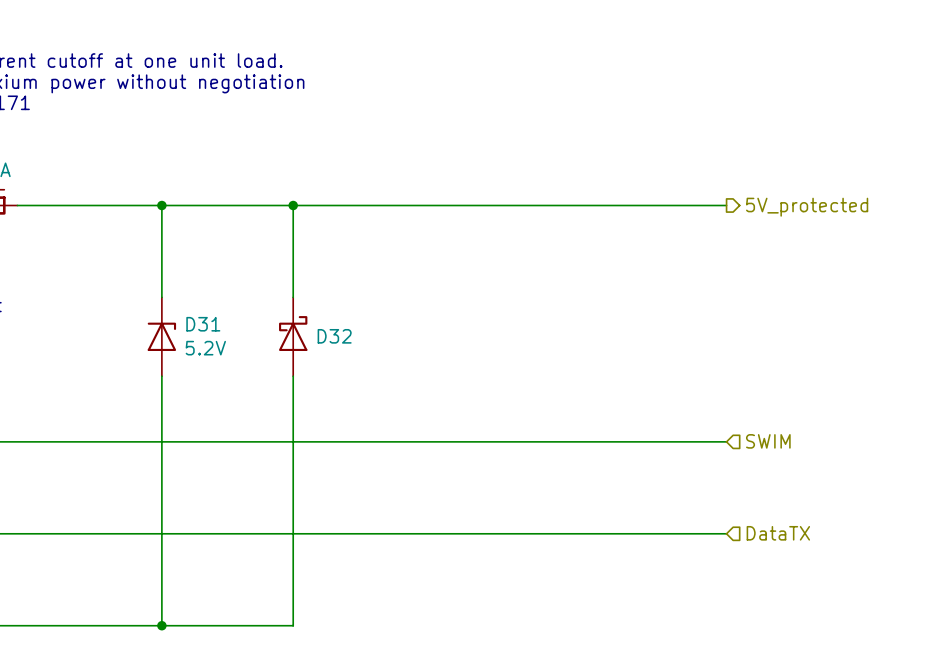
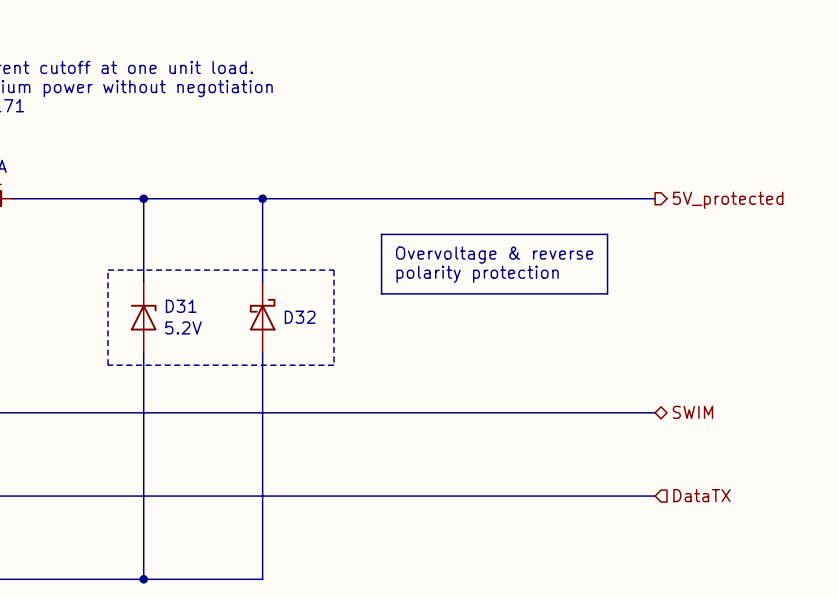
bus: none -> (381, 234) (381, 293) (607, 293) (607, 234) (381, 234)
text: none -> Overvoltage & reverse (494, 255)
line: none -> (108, 270) (108, 365) (333, 365) (333, 270) (108, 270)
text: none -> polarity protection (477, 274)
hierarchical label shape: input (768, 441) -> bidirectional (692, 412)

